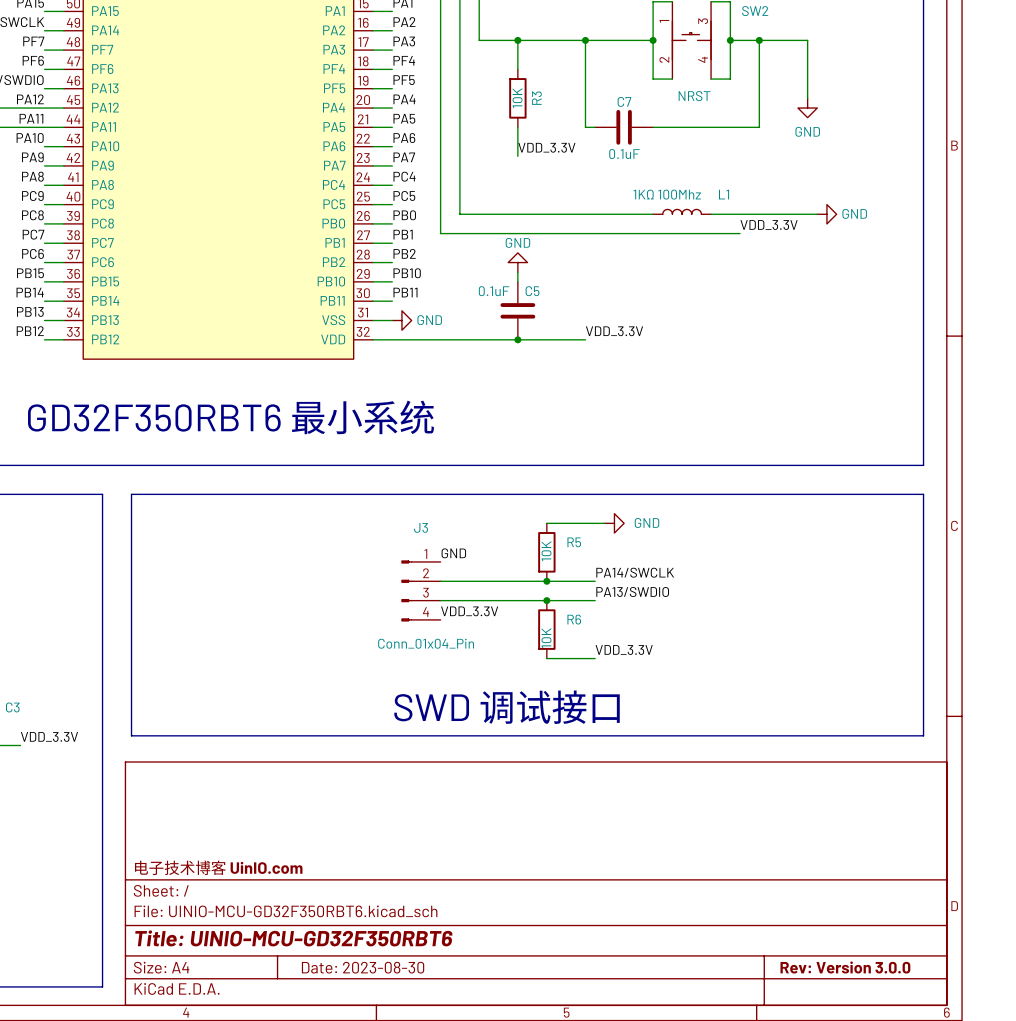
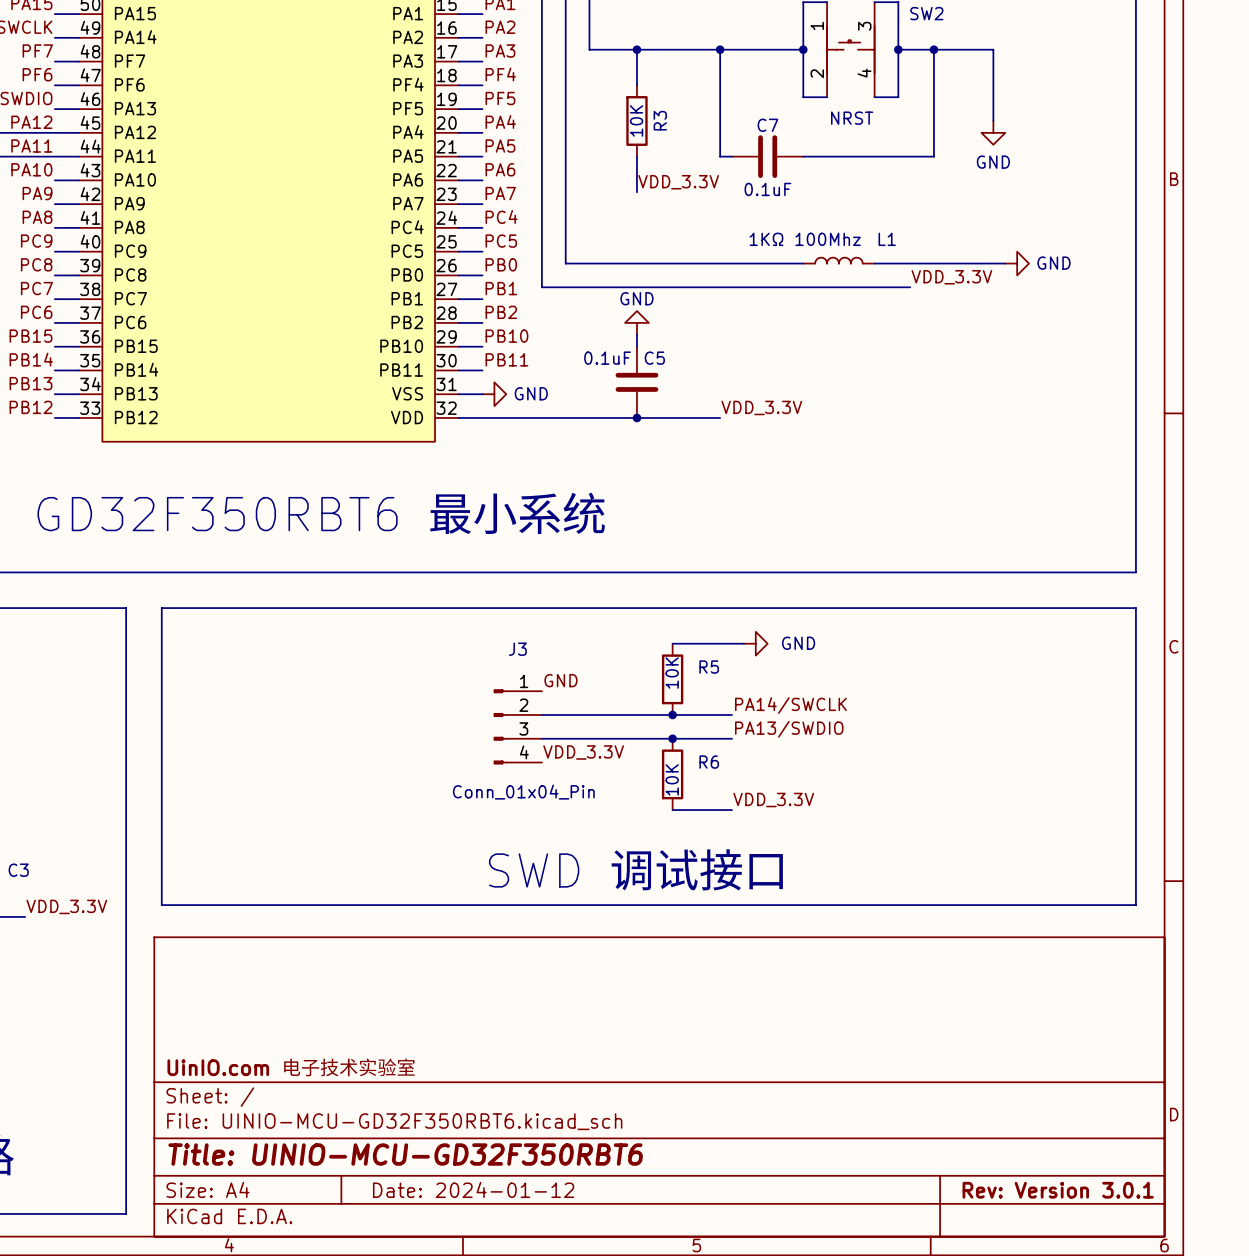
title block: 电子技术博客 UinIO.com (218, 867) -> UinIO.com 电子技术实验室 (291, 1067)
title block: Date: 2023-08-30 (363, 967) -> Date: 2024-01-12 (473, 1189)
title block: Rev: Version 3.0.0 (845, 967) -> Rev: Version 3.0.1 (1058, 1190)

